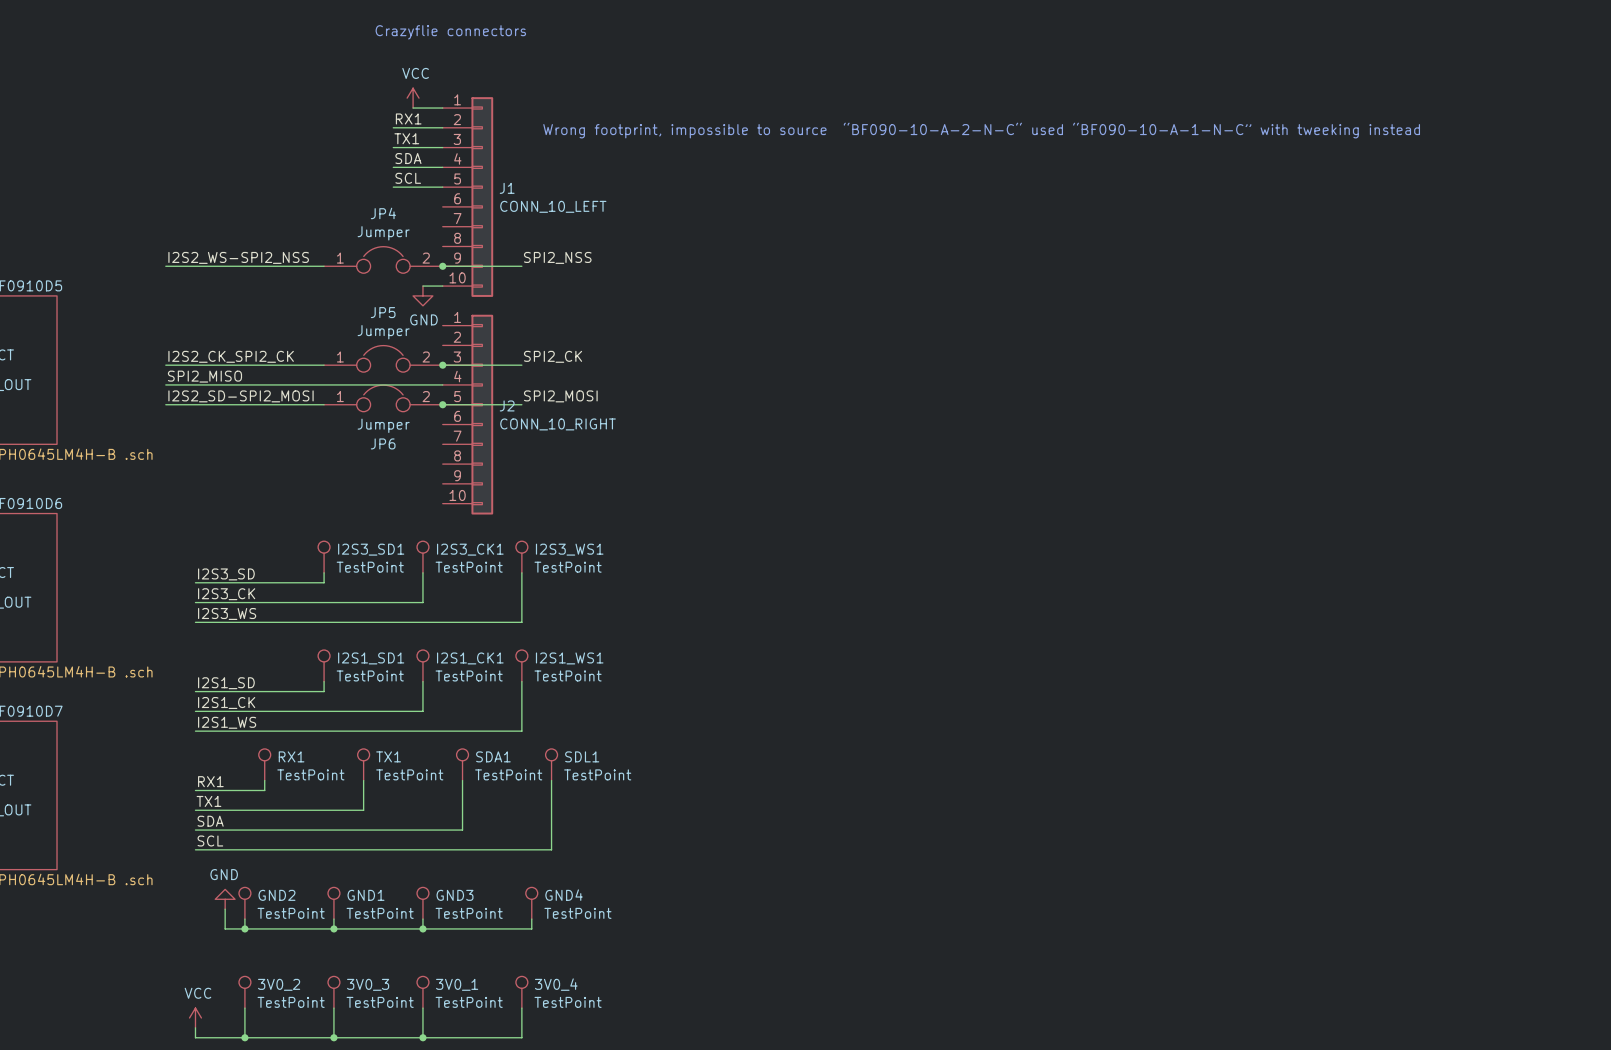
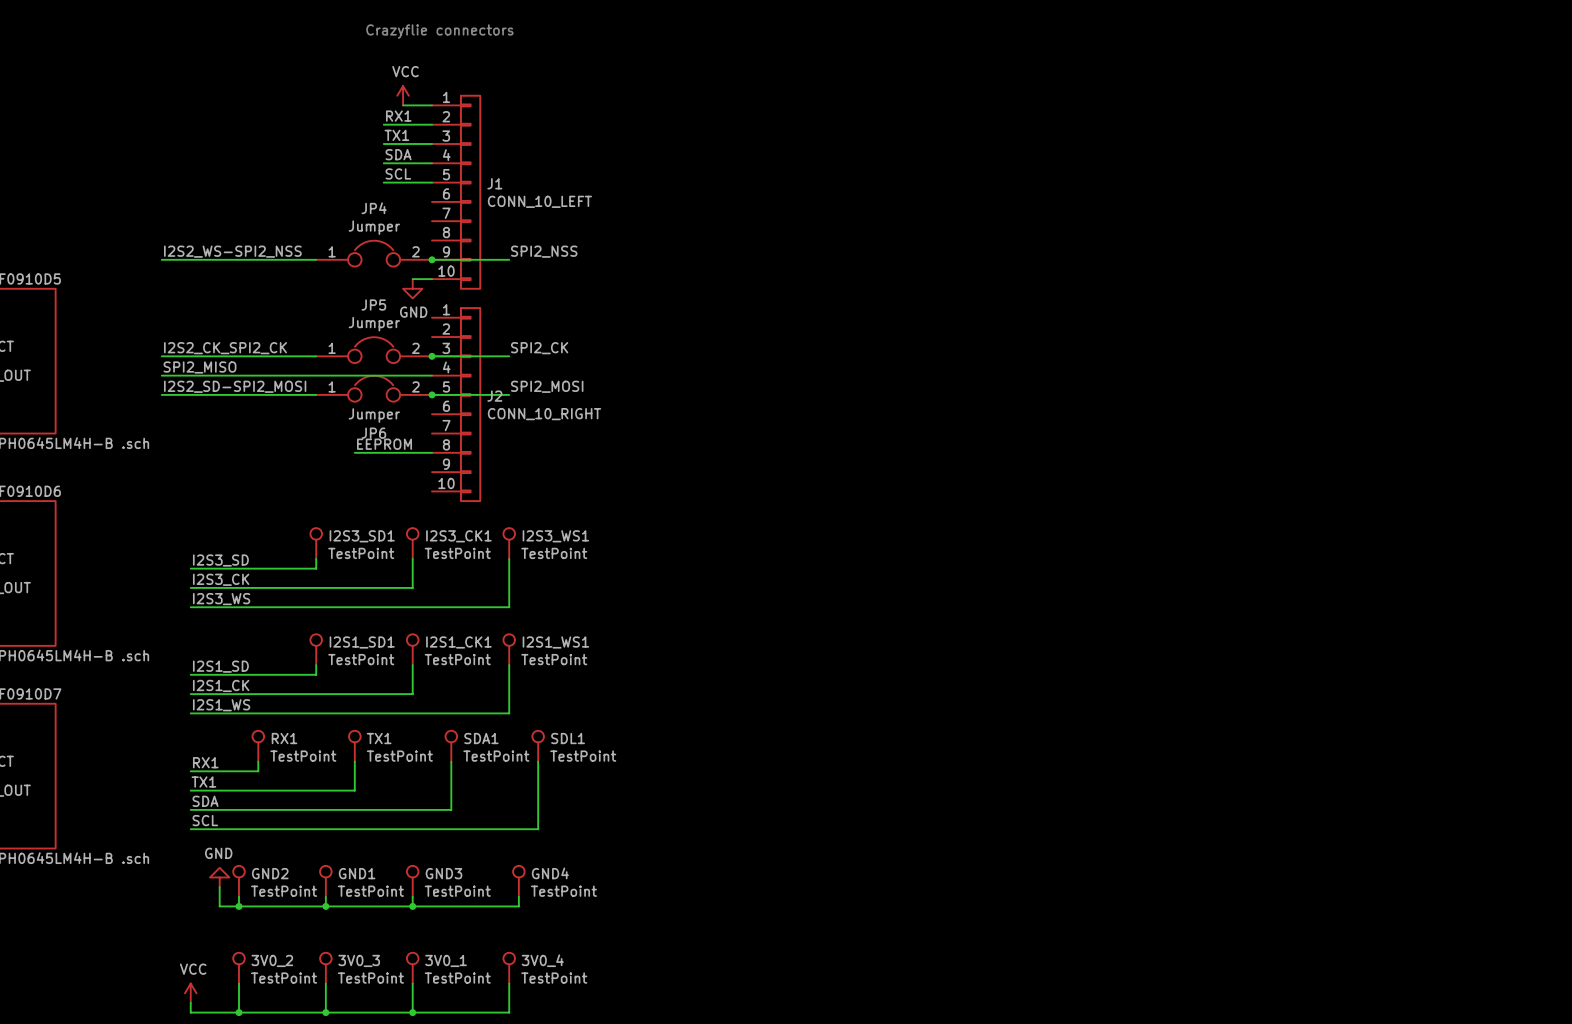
text: Wrong footprint, impossible to source “BF090-10-A-2-N-C“ used “BF090-10-A-1-N-C” with tweeking instead (981, 130) -> none
label: none -> EEPROM (384, 444)
wire: none -> (354, 452) (432, 452)

